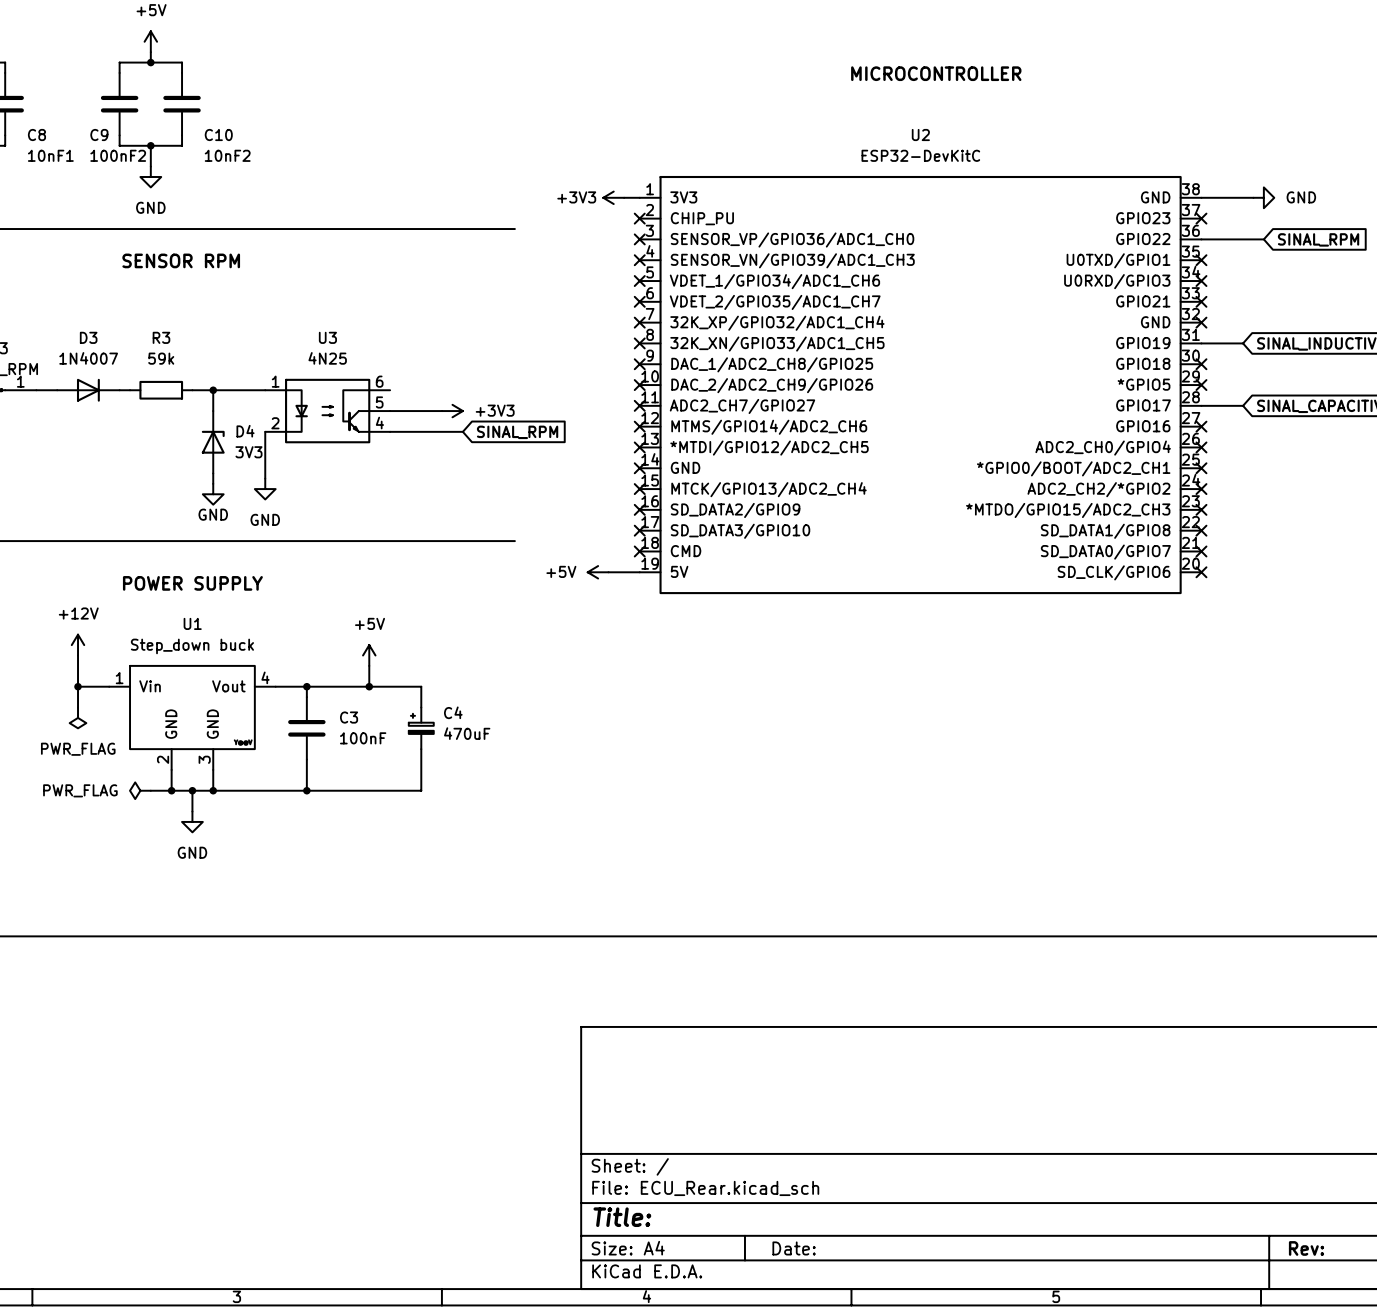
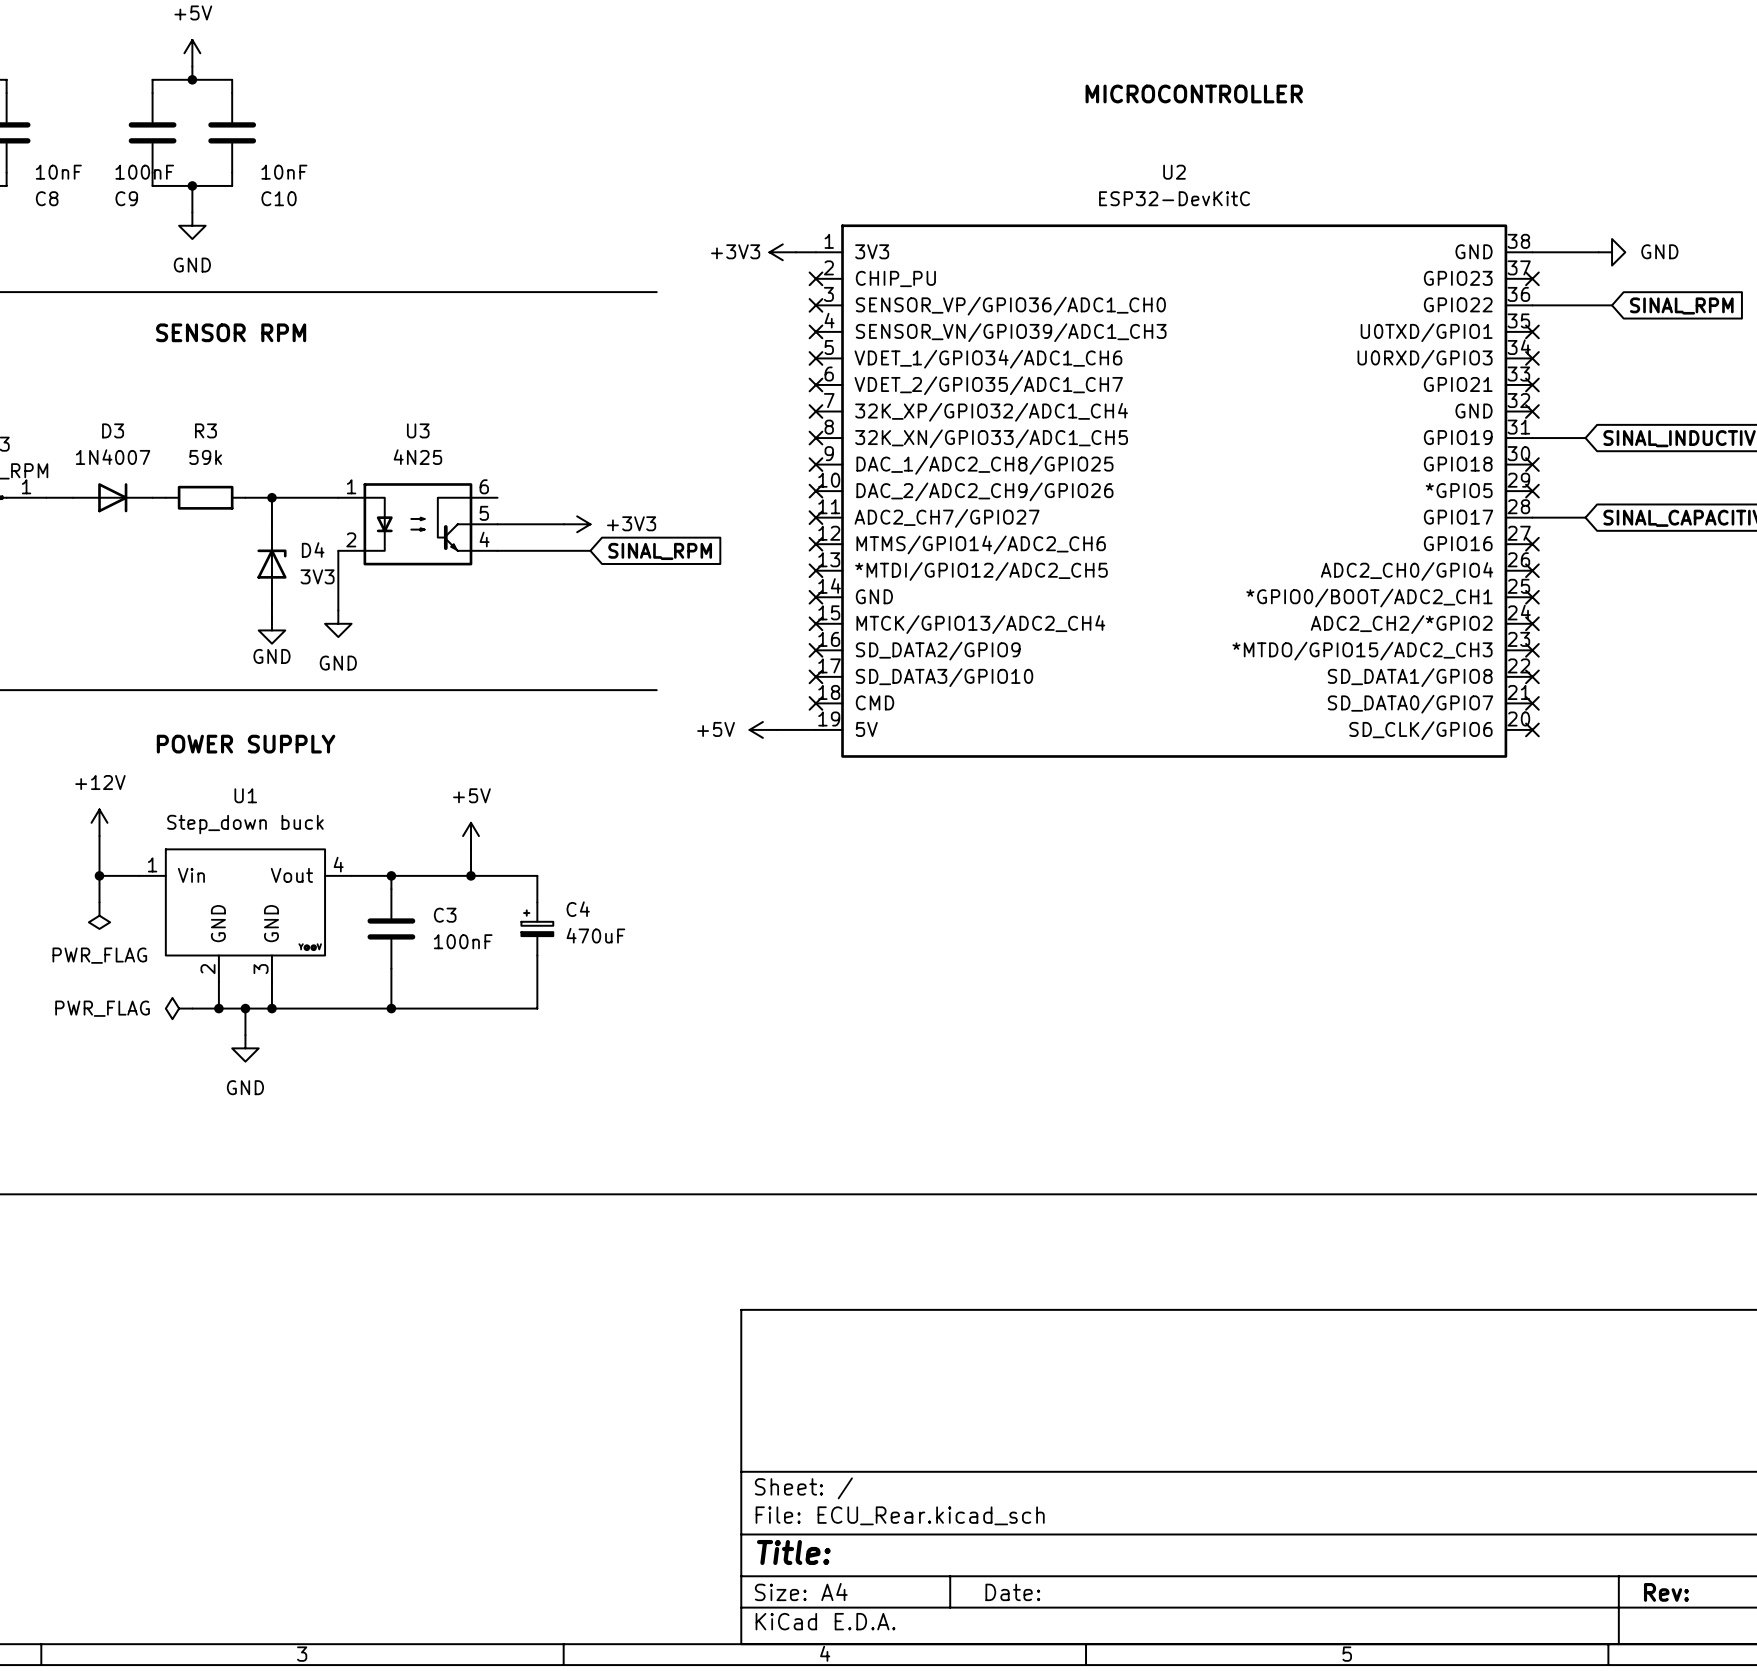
10nF1 value: C8 (36, 135) -> 10nF (58, 172)
100nF2 value: C9 (99, 135) -> 100nF (144, 172)
10nF2 value: C10 (218, 135) -> 10nF (284, 172)
10nF1 name: 10nF1 (50, 155) -> C8 (47, 198)
100nF2 name: 100nF2 (118, 155) -> C9 (126, 198)
10nF2 name: 10nF2 (227, 155) -> C10 (279, 198)

